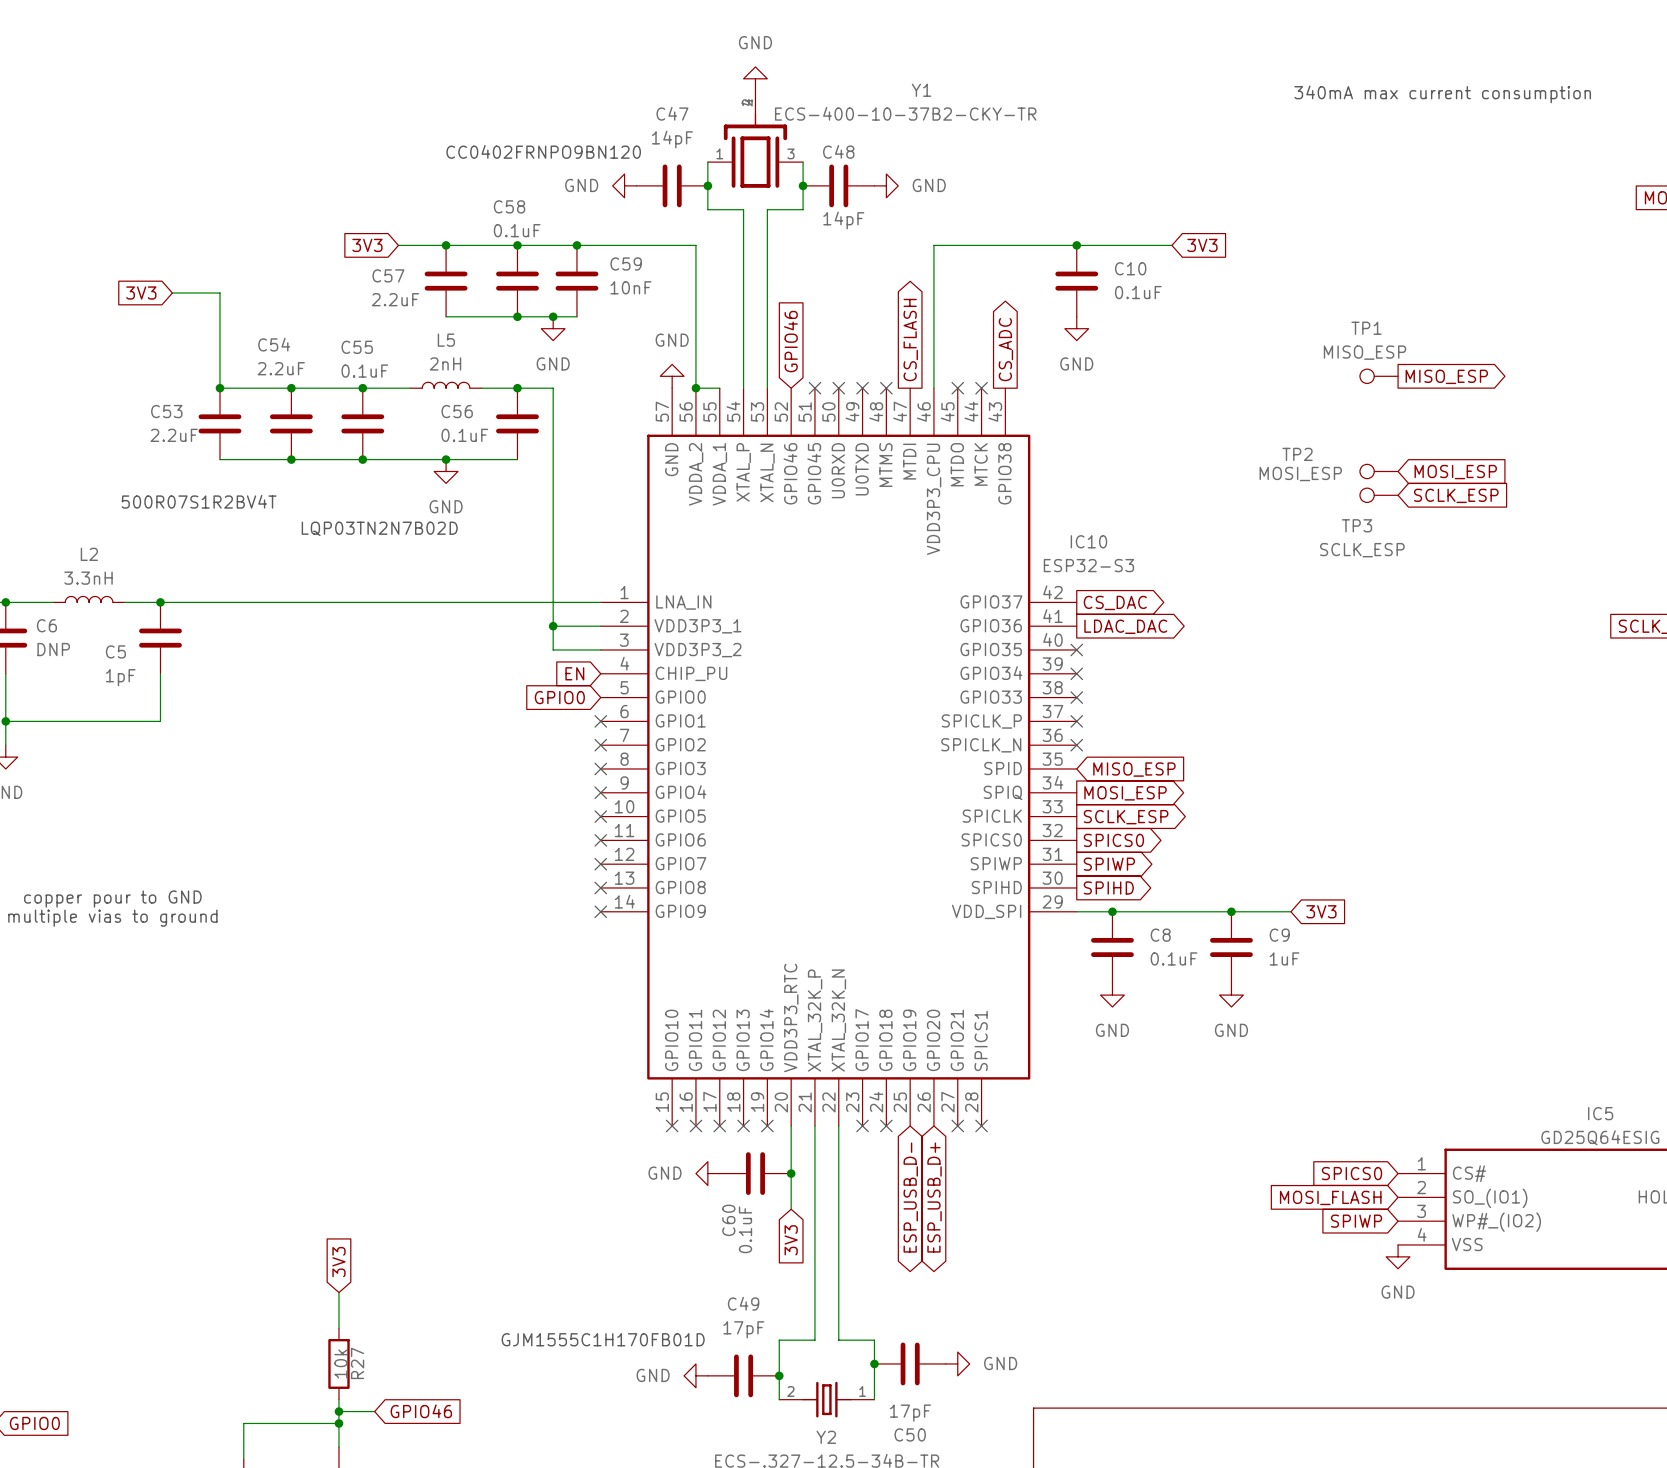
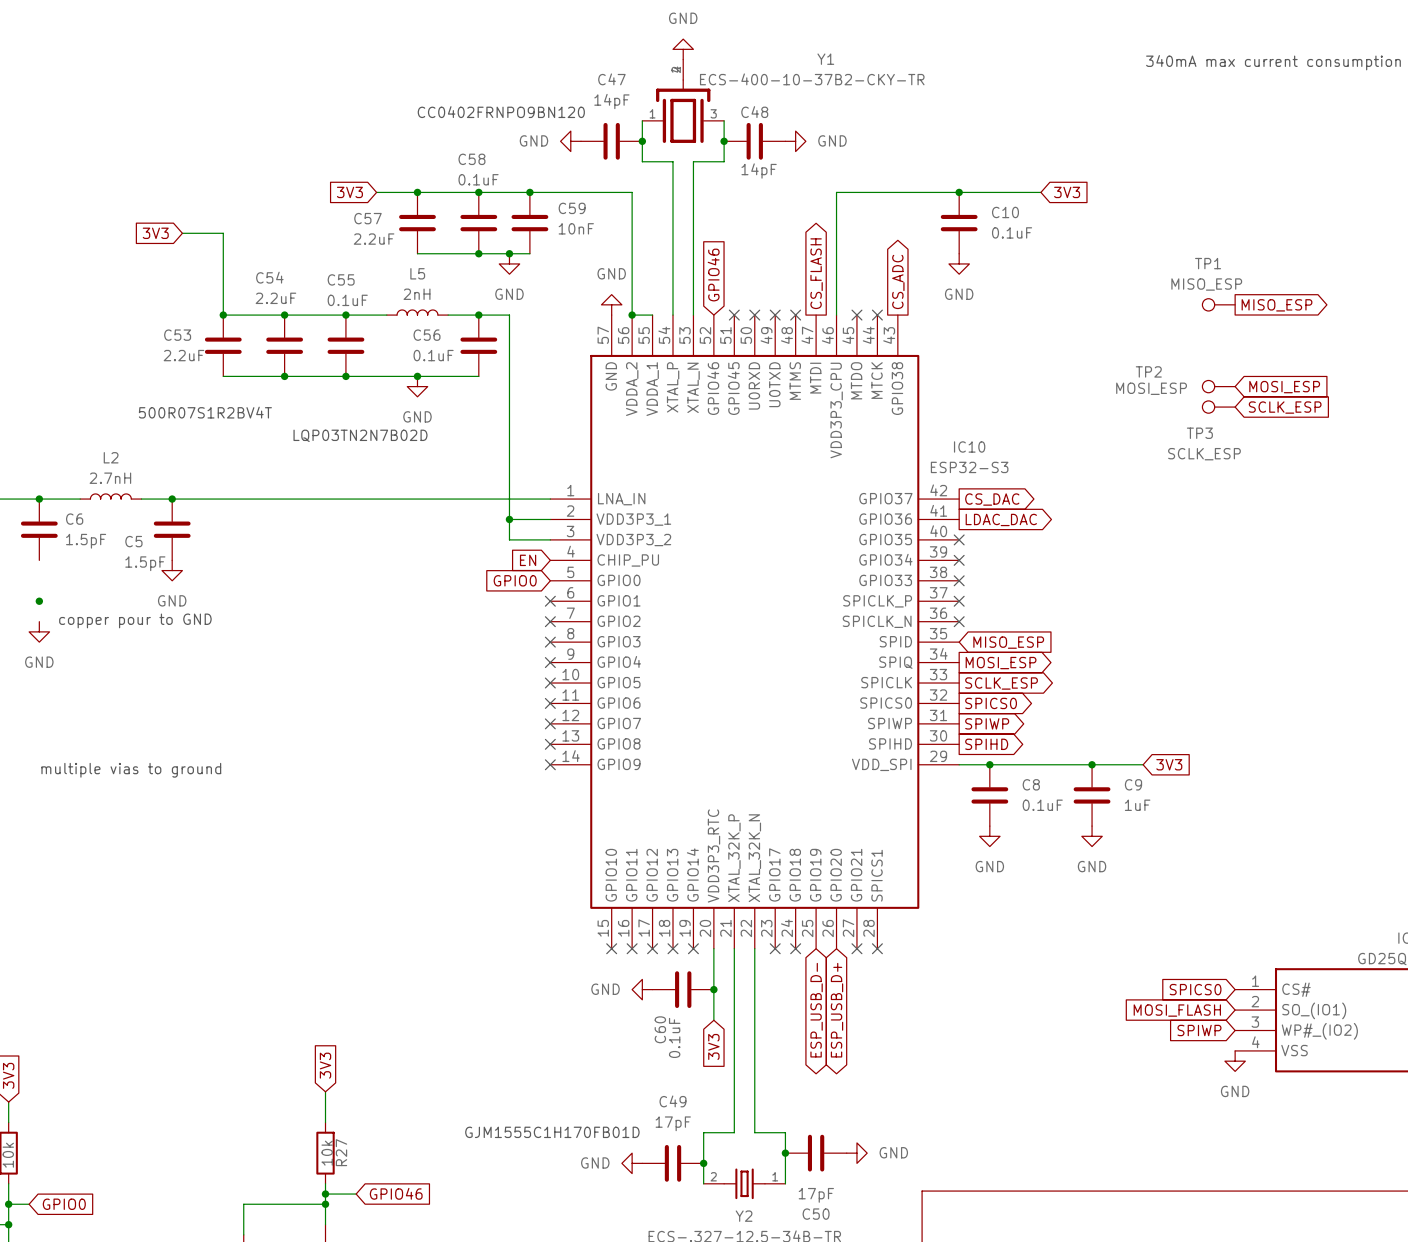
L2 value: 3.3nH (88, 578) -> 2.7nH (110, 478)
C6 value: DNP (53, 649) -> 1.5pF (86, 541)
wire: (5, 673) (5, 745) -> none
wire: (160, 673) (160, 721) (5, 721) -> none
C5 value: 1pF (120, 677) -> 1.5pF (145, 563)
power symbol: none -> GND (172, 570)
text position: copper pour to GND (112, 899) -> copper pour to GND (135, 620)

